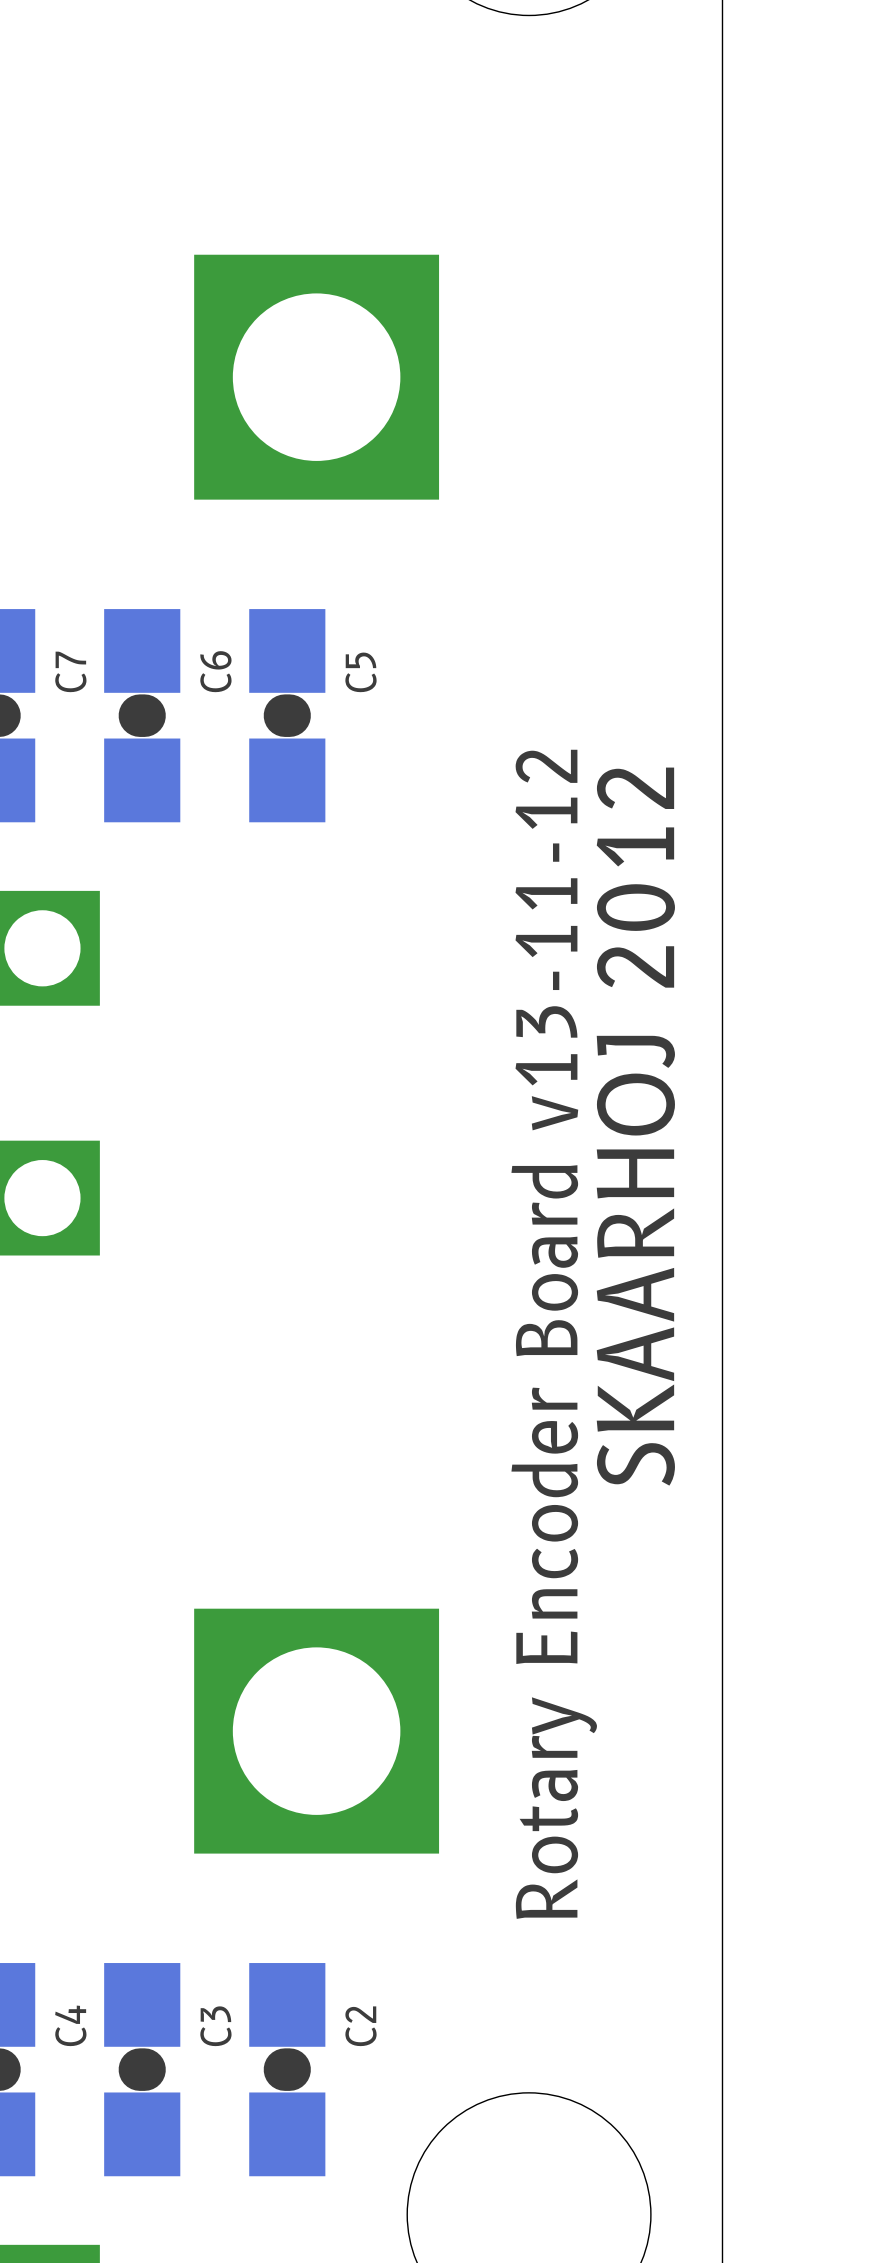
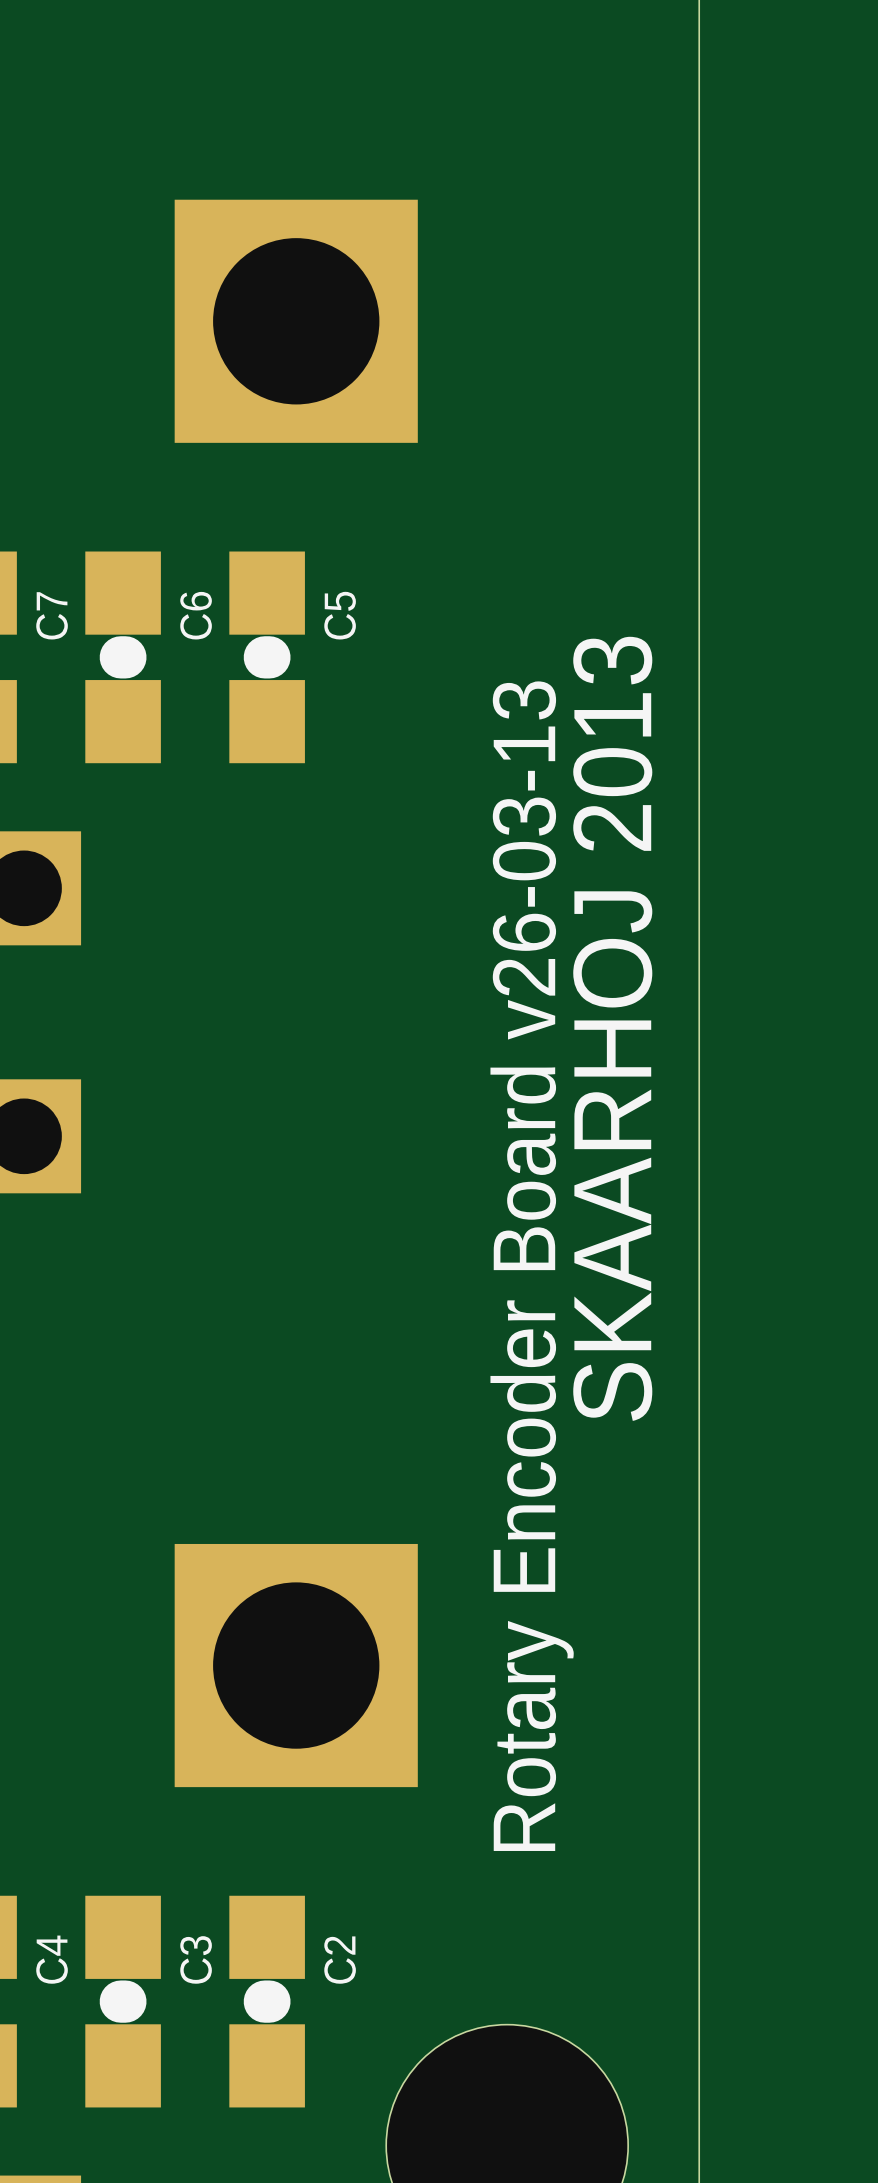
text: SKAARHOJ 2012 (635, 1126) -> SKAARHOJ 2013 (612, 1028)
text: Rotary Encoder Board v13-11-12 (554, 1334) -> Rotary Encoder Board v26-03-13 (532, 1266)

